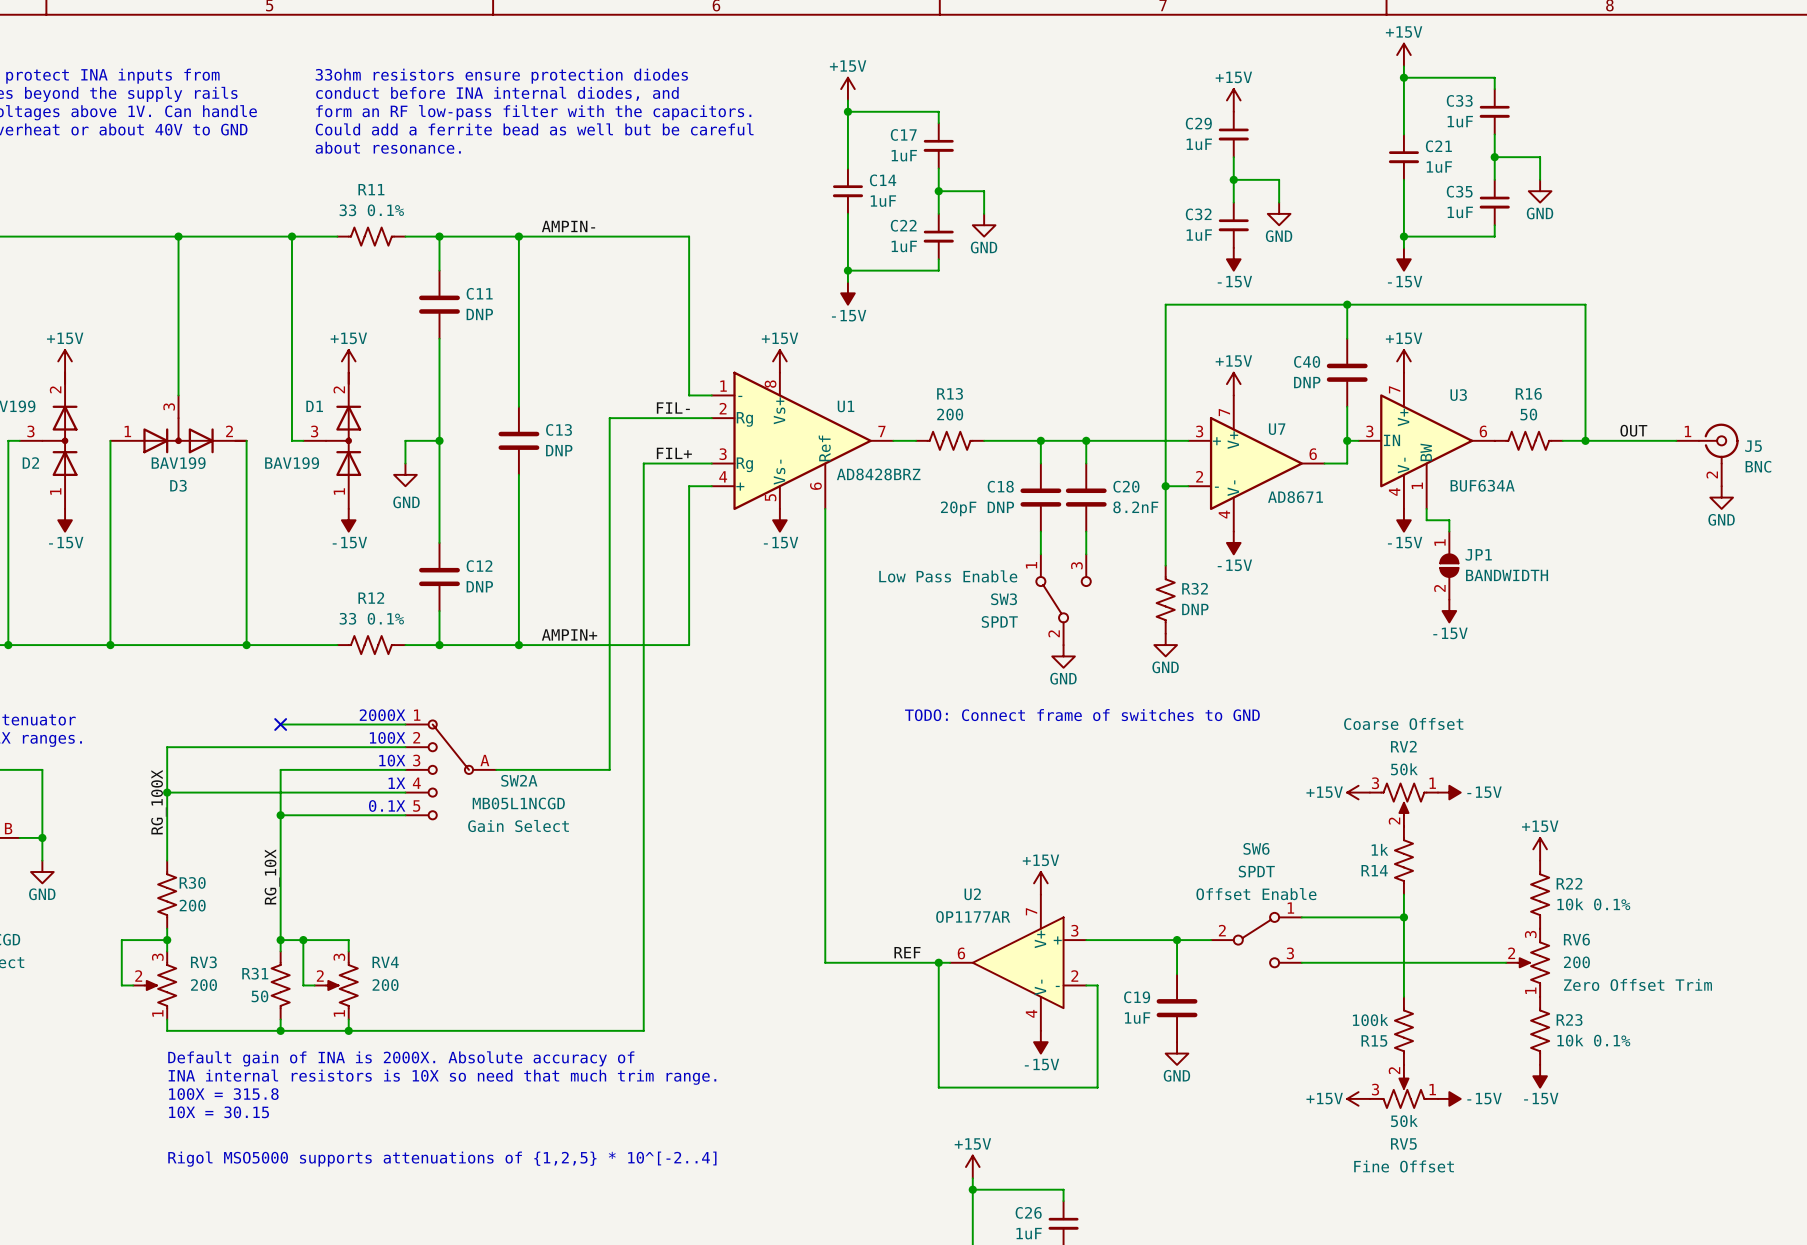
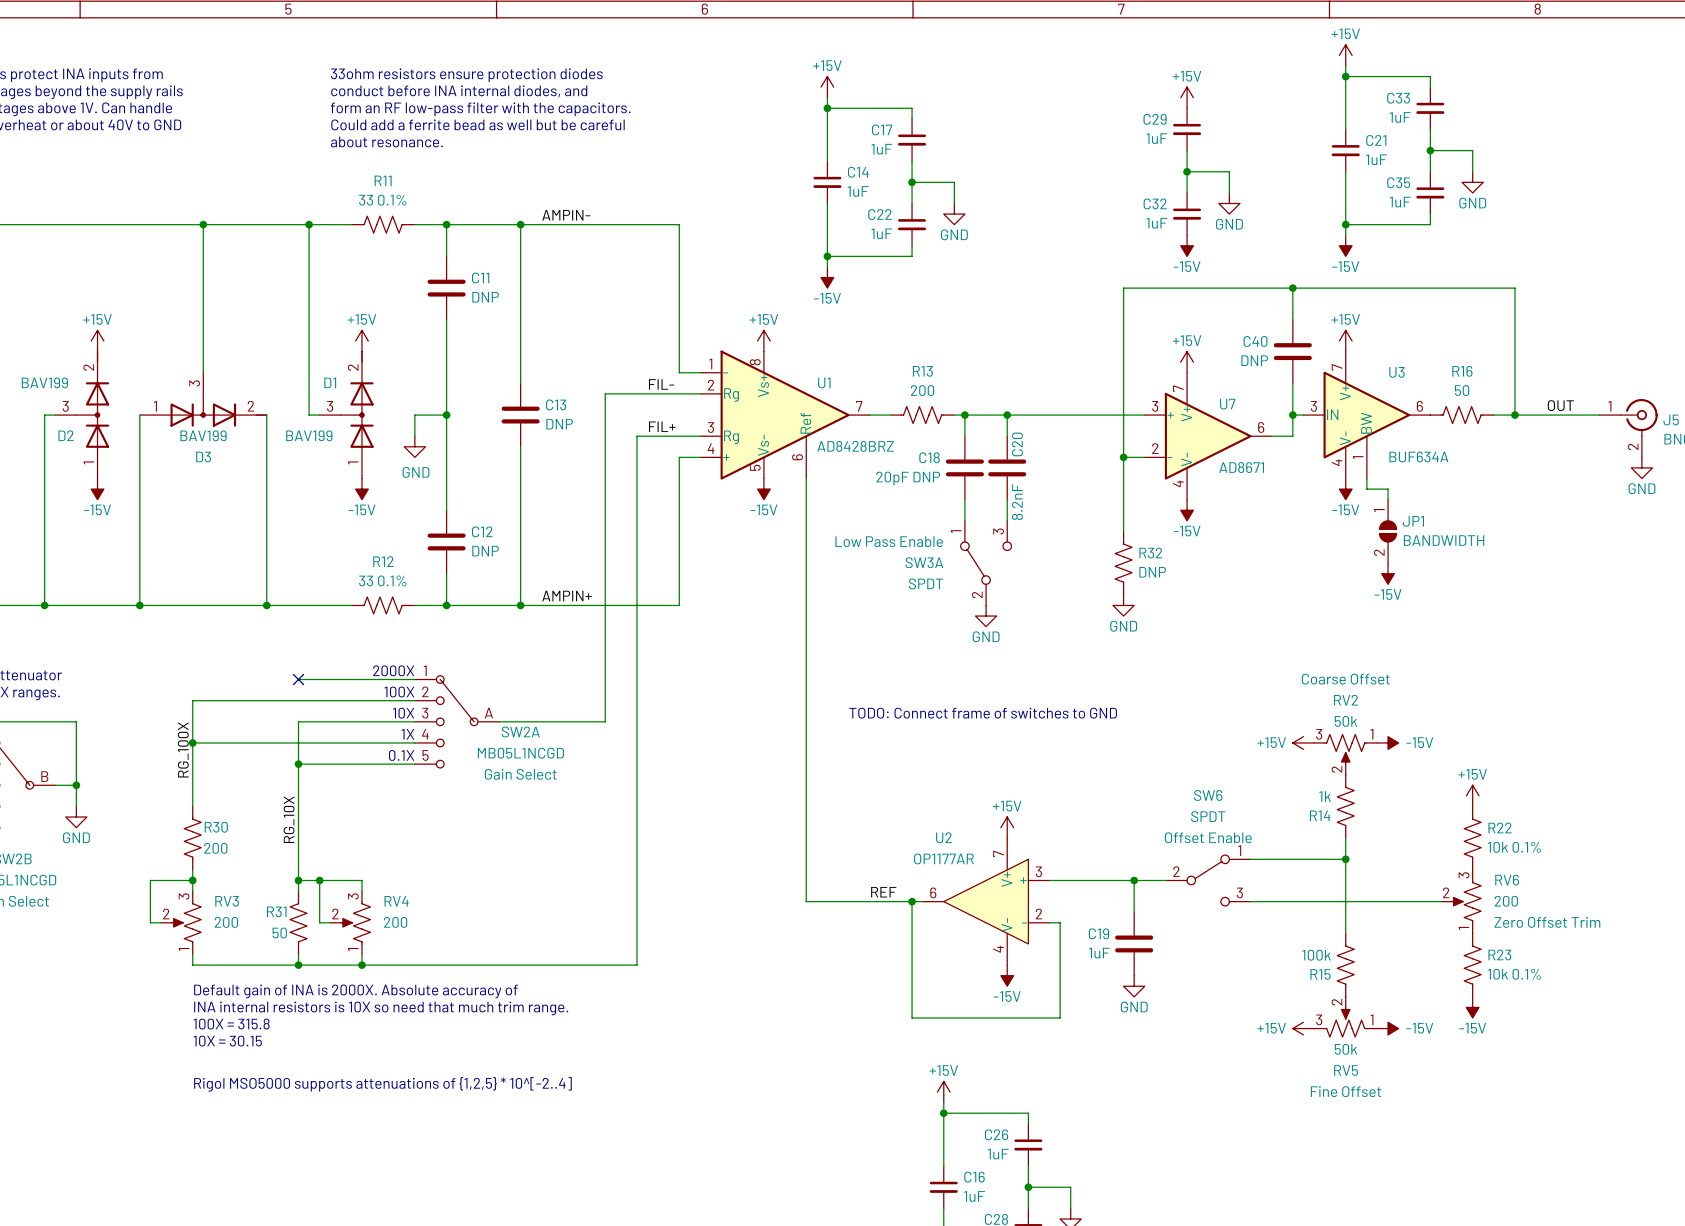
junction: none -> (964, 415)
wire: (1086, 440) (1086, 463) -> (964, 415) (964, 436)
junction: (1086, 440) -> none
C18 name: C18 (1000, 486) -> C20 (1017, 444)
C18: none -> 20pF DNP (964, 467)
C20: 8.2nF (1086, 497) -> none
C18 value: 20pF DNP (977, 508) -> 8.2nF (1017, 502)
wire: (1086, 531) (1086, 554) -> (964, 499) (964, 520)
SW3A: none -> SPDT (986, 563)
SW3: SPDT (1063, 599) -> none
power symbol position: GND (1063, 656) -> GND (986, 616)
text position: TODO: Connect frame of switches to GND (1082, 715) -> TODO: Connect frame of switches to GND (983, 713)

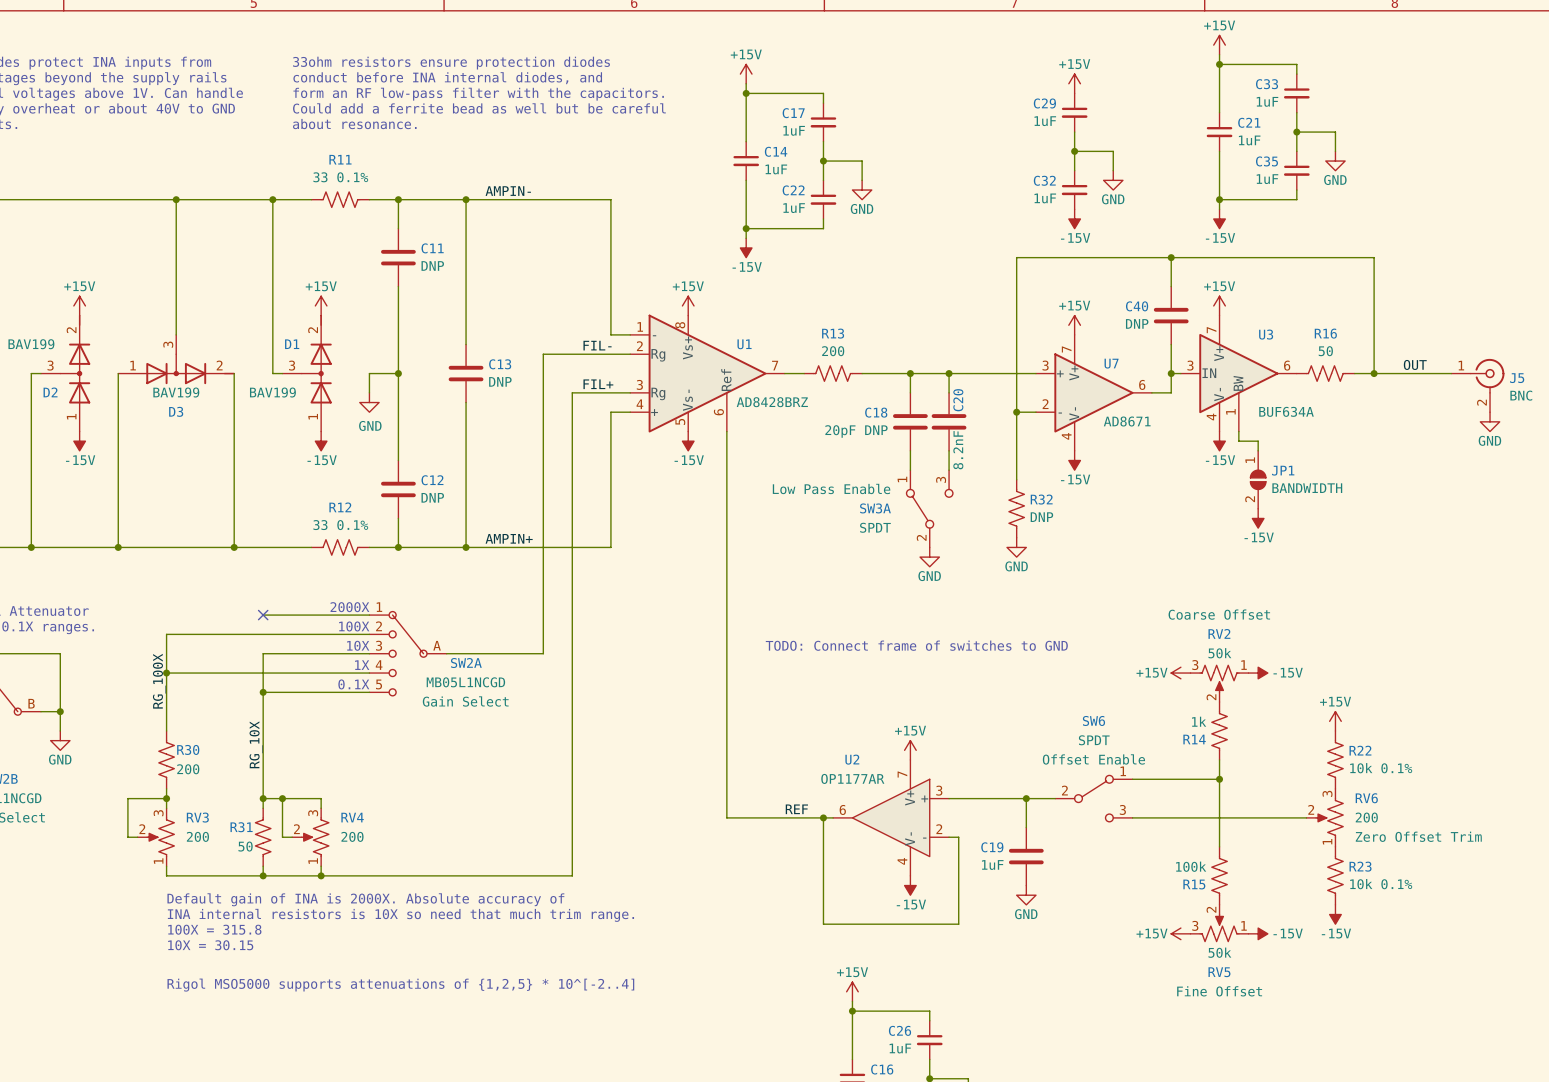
wire: (964, 415) (964, 436) -> (949, 373) (949, 392)
junction: (964, 415) -> none
junction: none -> (949, 373)
C20 name: C20 (1017, 444) -> C18 (876, 412)
C18: 20pF DNP (964, 467) -> none
C20: none -> 8.2nF (949, 421)
wire: (964, 499) (964, 520) -> (949, 450) (949, 470)
C20 value: 8.2nF (1017, 502) -> 20pF DNP (856, 431)
SW3A position: (986, 563) -> (929, 508)
power symbol position: GND (986, 616) -> GND (929, 557)

